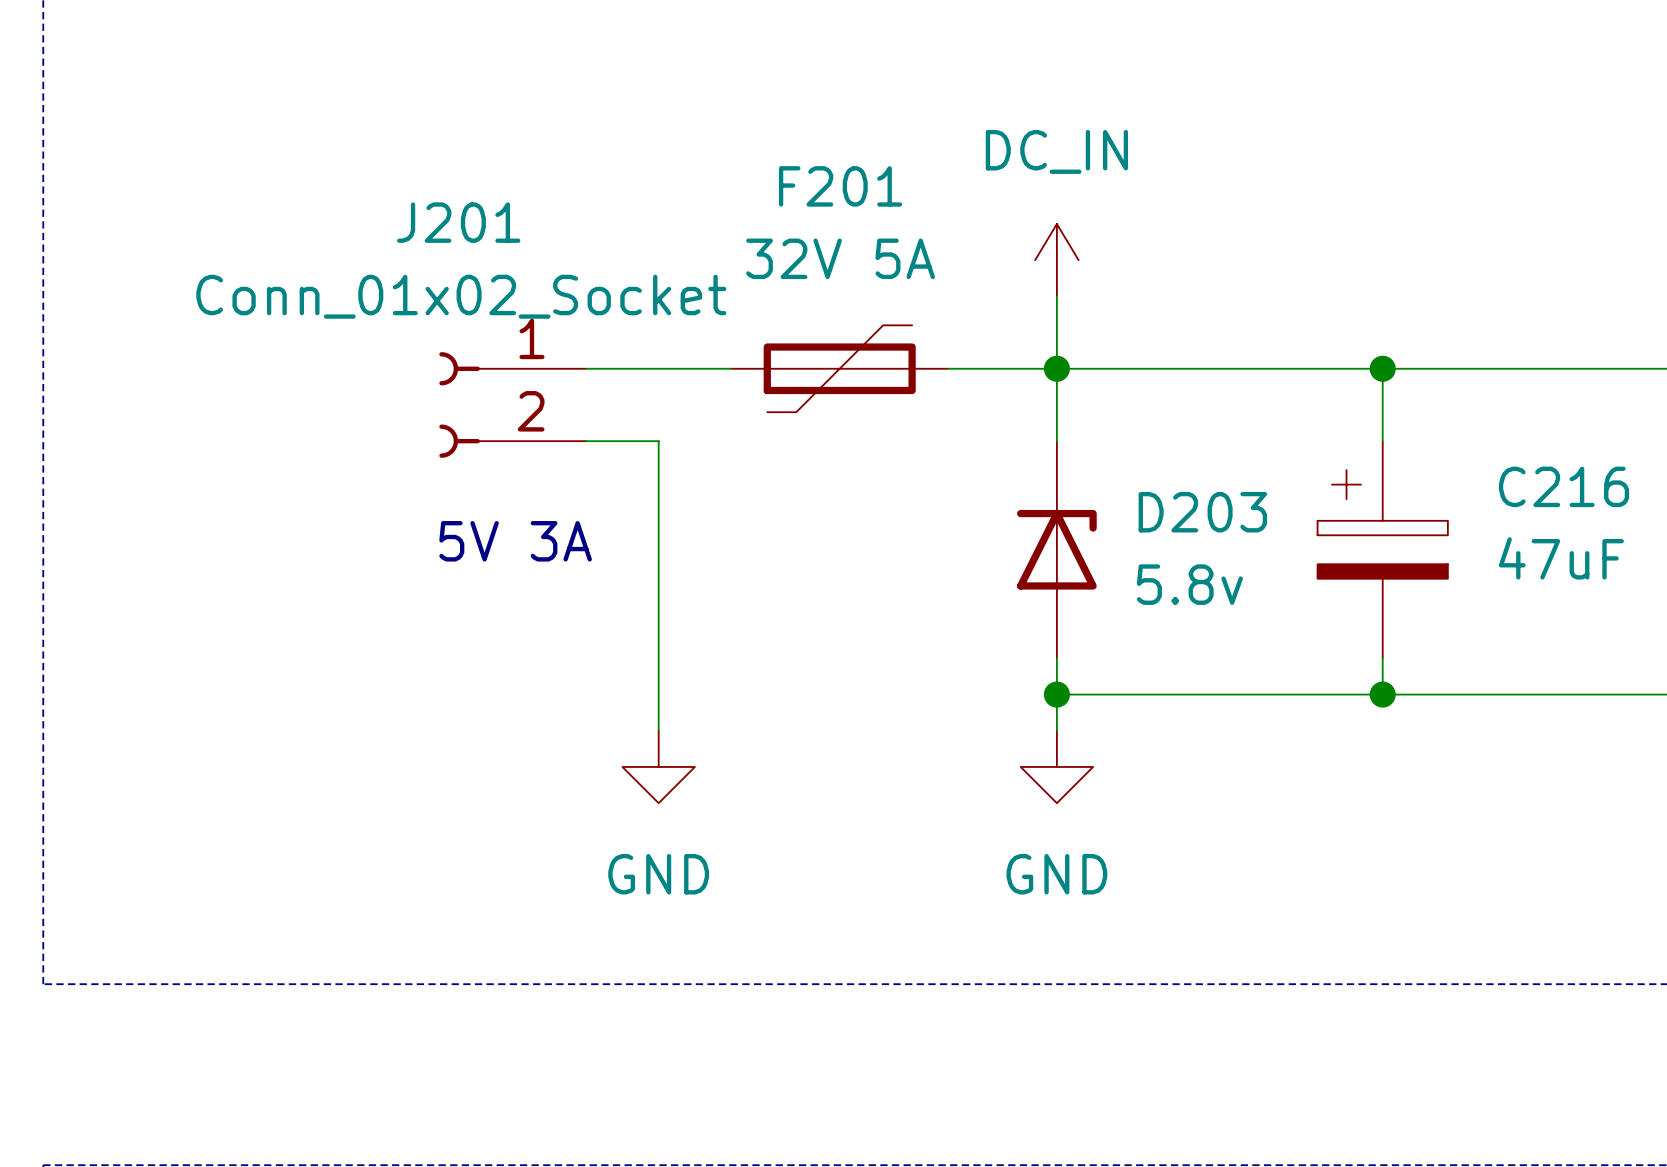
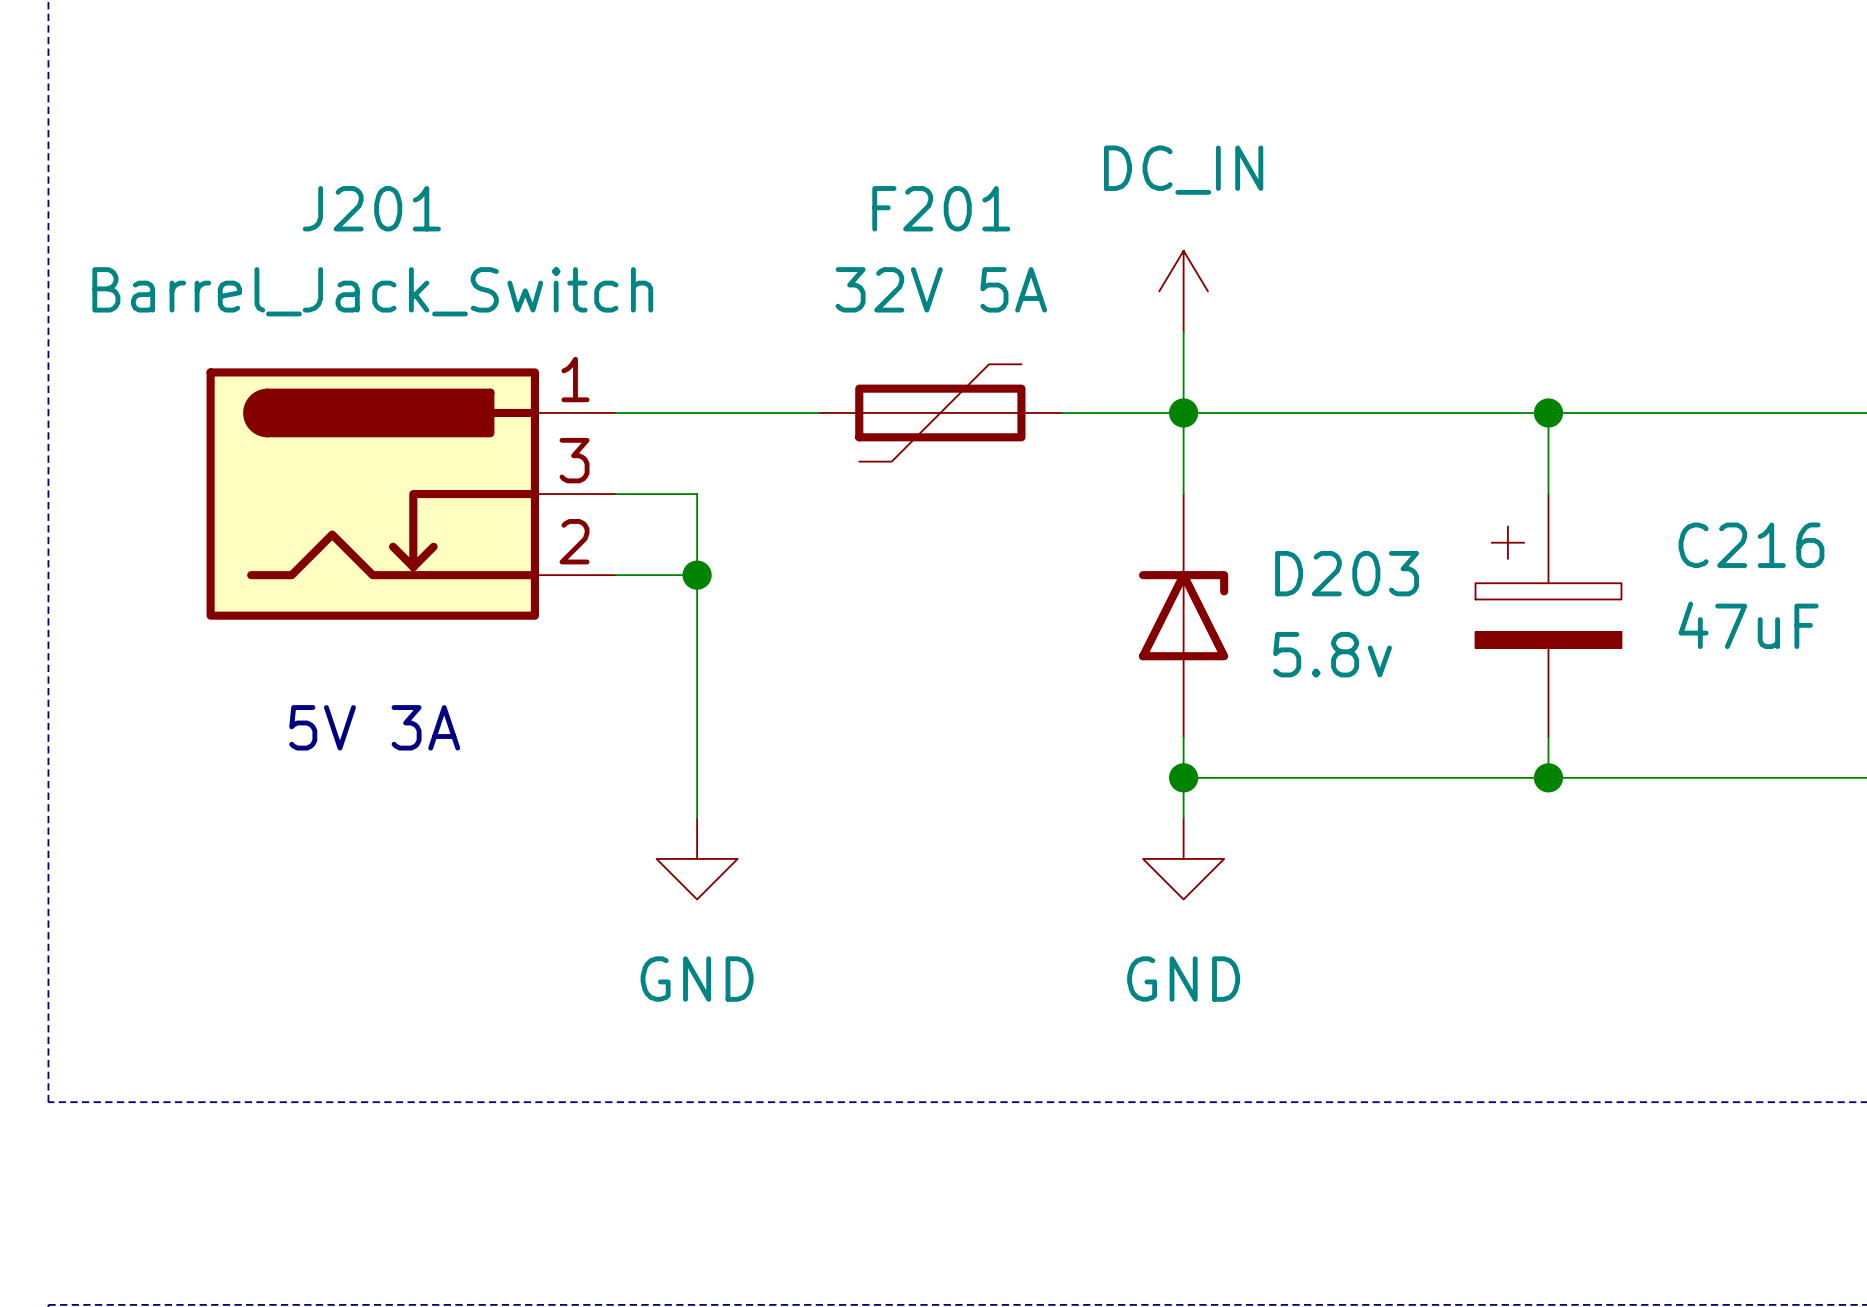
J201 name position: J201 (458, 222) -> J201 (371, 208)
J201 value: Conn_01x02_Socket (461, 296) -> Barrel_Jack_Switch (372, 291)
J201 symbol: [439, 352, 587, 458] -> [206, 368, 617, 620]
wire: (622, 441) (658, 441) (658, 730) -> (697, 494) (697, 818)
wire: none -> (616, 575) (697, 575)
junction: none -> (697, 575)
text position: 5V 3A (515, 541) -> 5V 3A (374, 727)
power symbol position: GND (658, 766) -> GND (697, 858)

